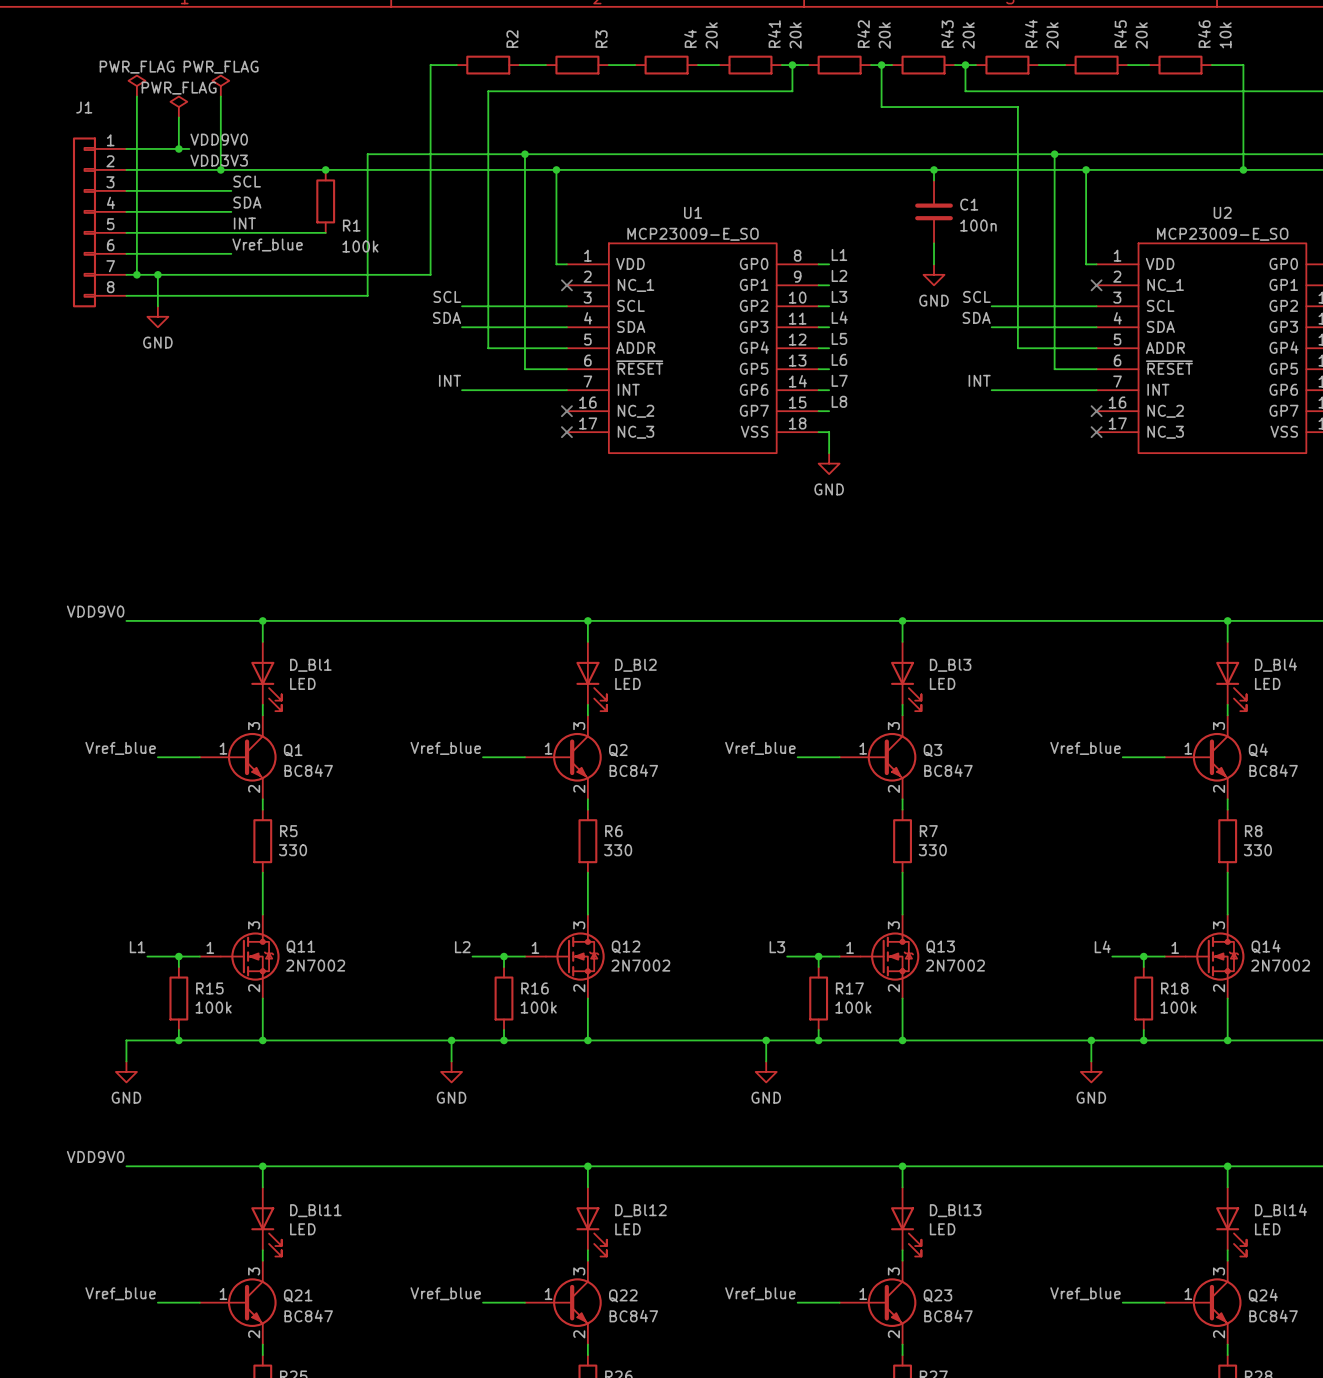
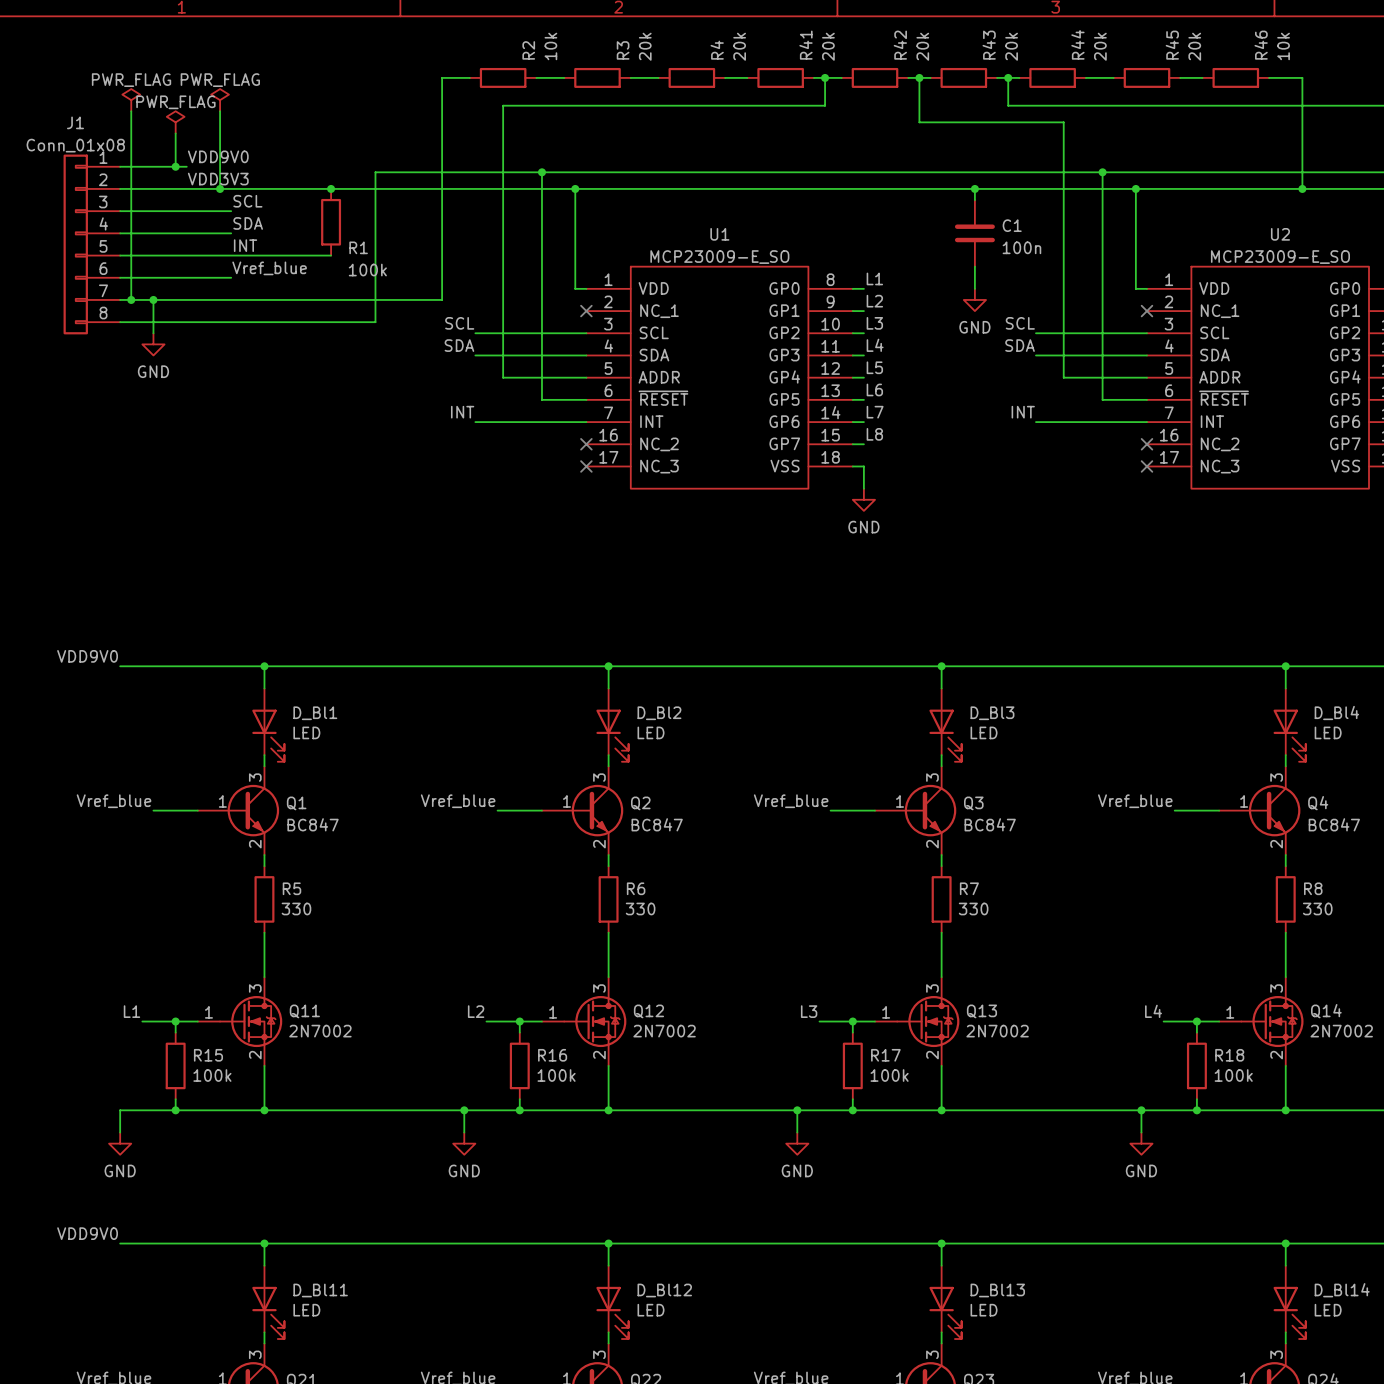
R2 value: none -> 10k (550, 46)
R3 value: none -> 20k (645, 46)
J1 value: none -> Conn_01x08 (75, 145)

